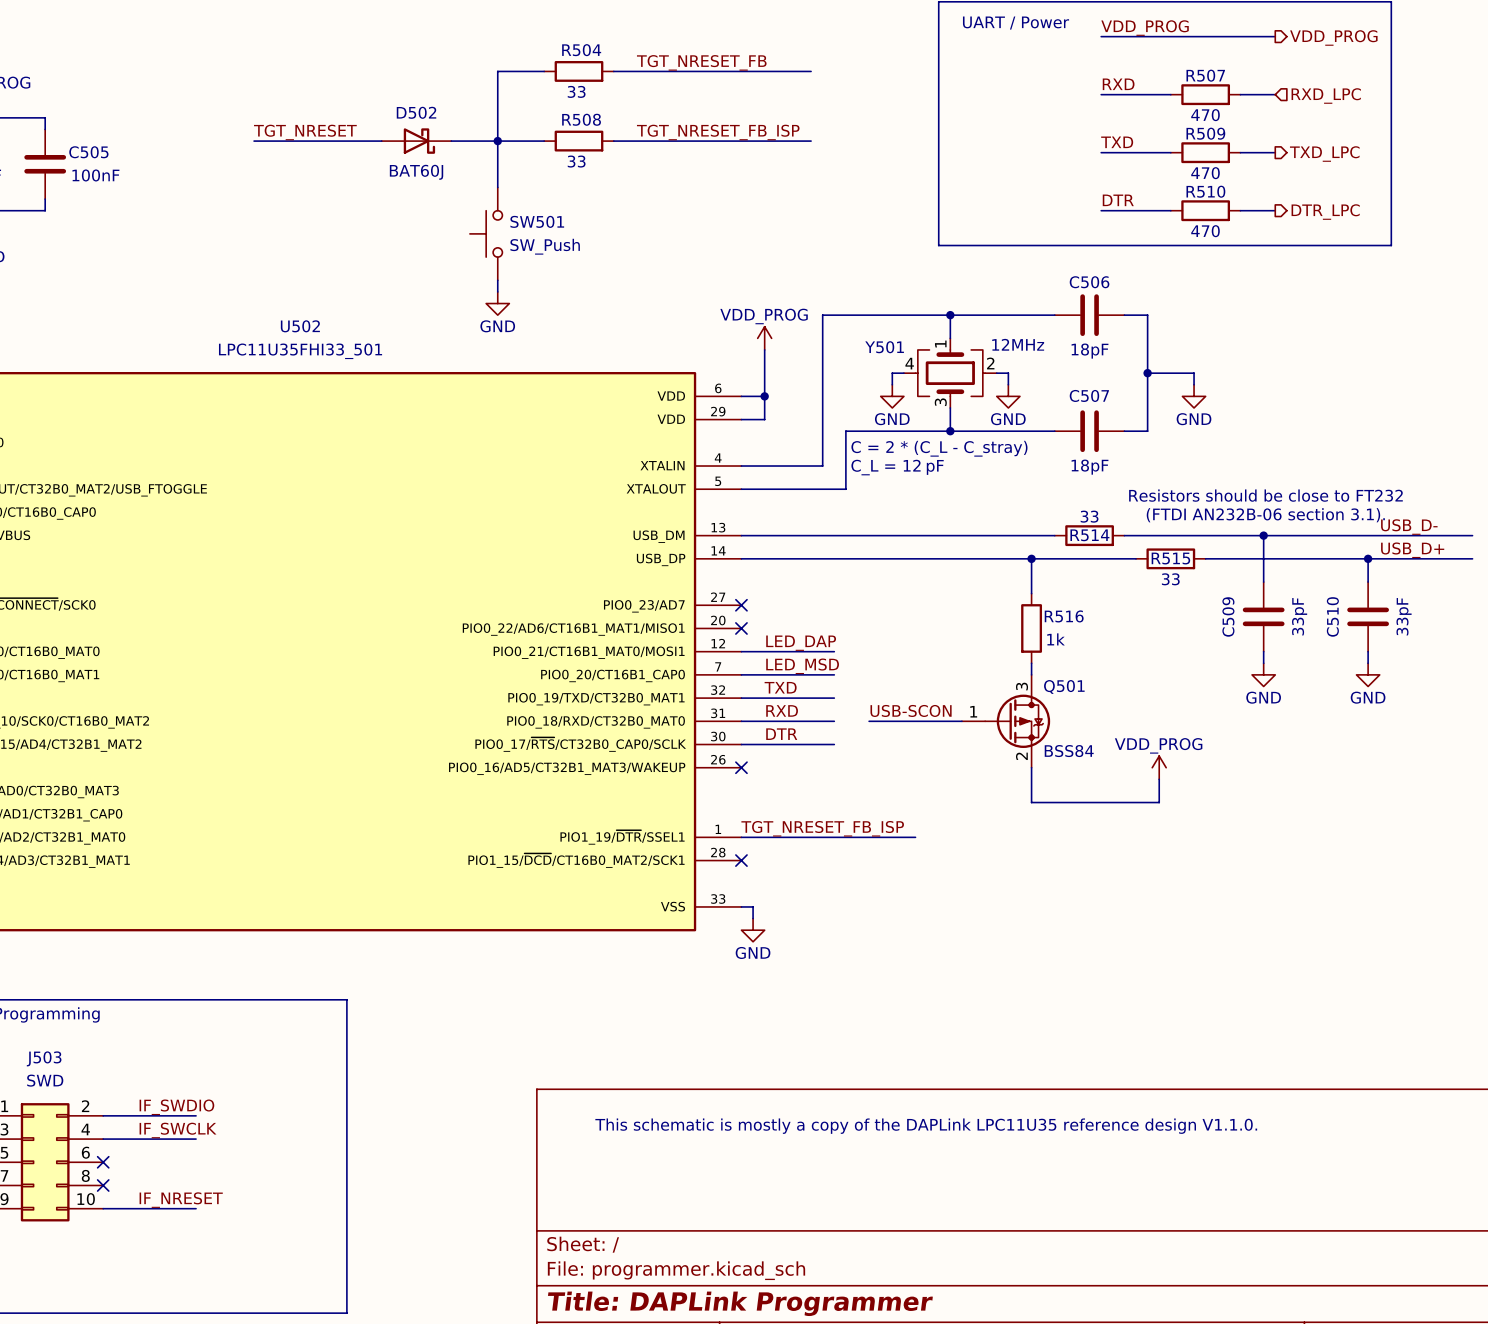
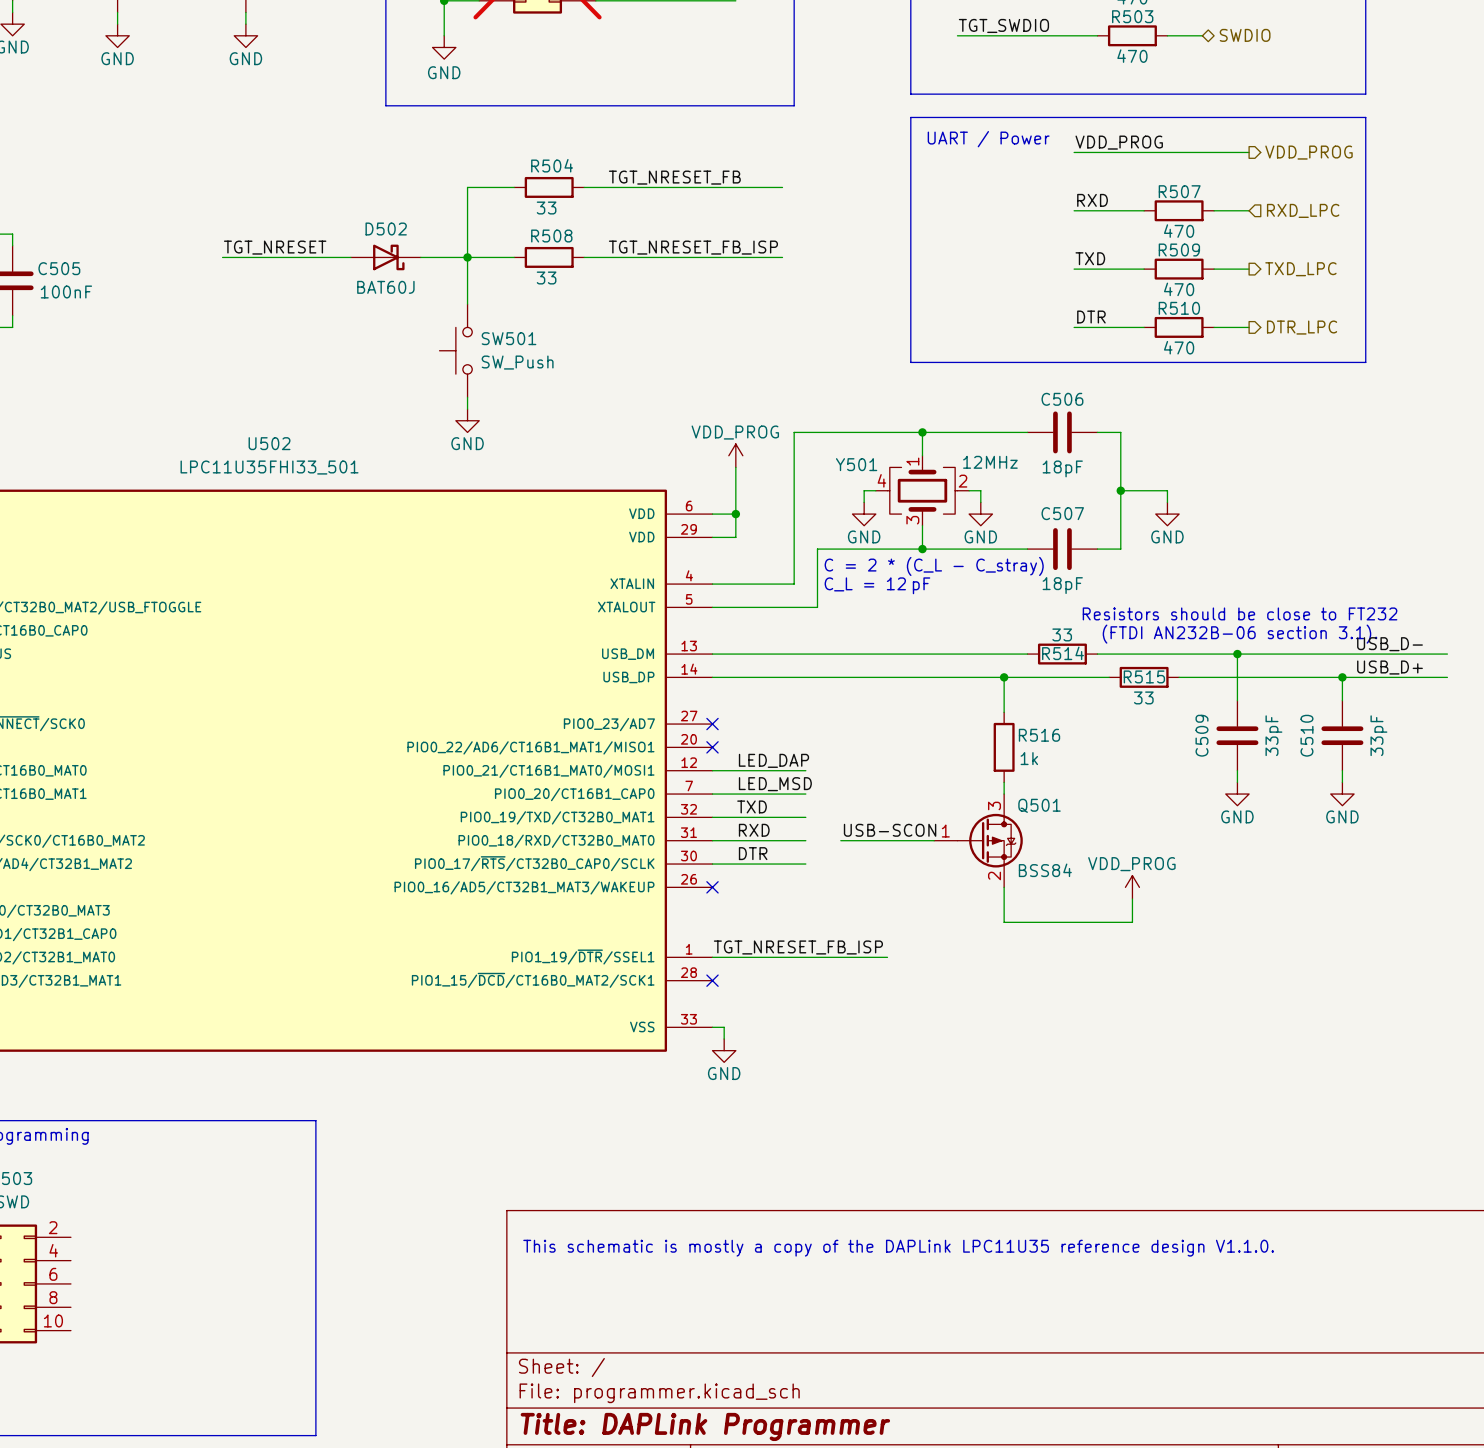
label: IF_SWDIO (176, 1107) -> none
wire: (103, 1115) (196, 1115) -> none
label: IF_SWCLK (178, 1130) -> none
wire: (103, 1139) (196, 1139) -> none
no-connect mark: (103, 1162) -> none
no-connect mark: (103, 1185) -> none
label: IF_NRESET (181, 1200) -> none
wire: (103, 1208) (196, 1208) -> none

